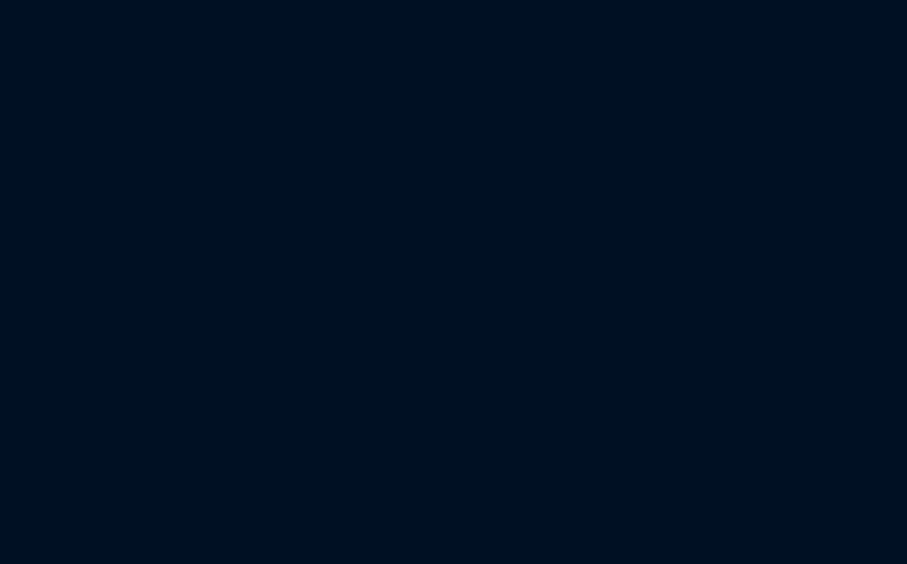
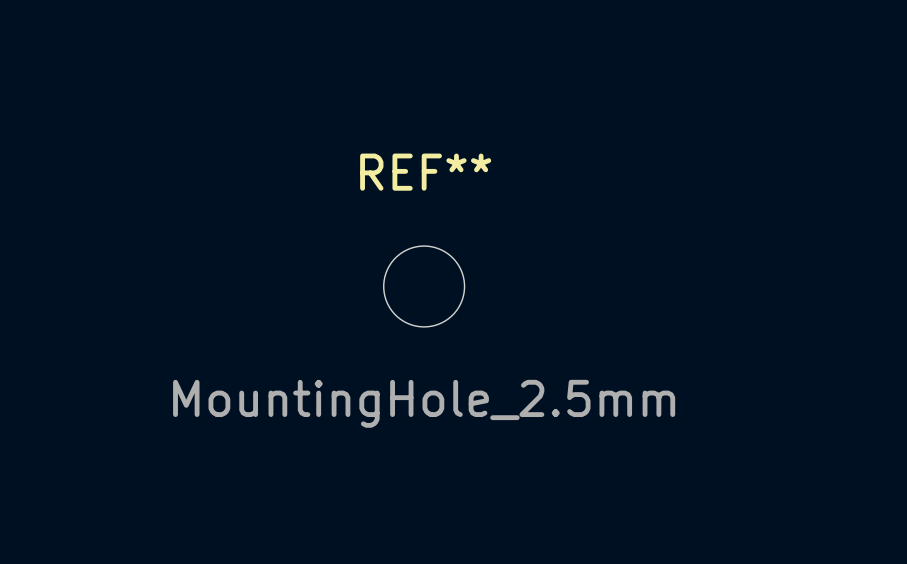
REF**: none -> MountingHole_2.5mm (424, 286)

